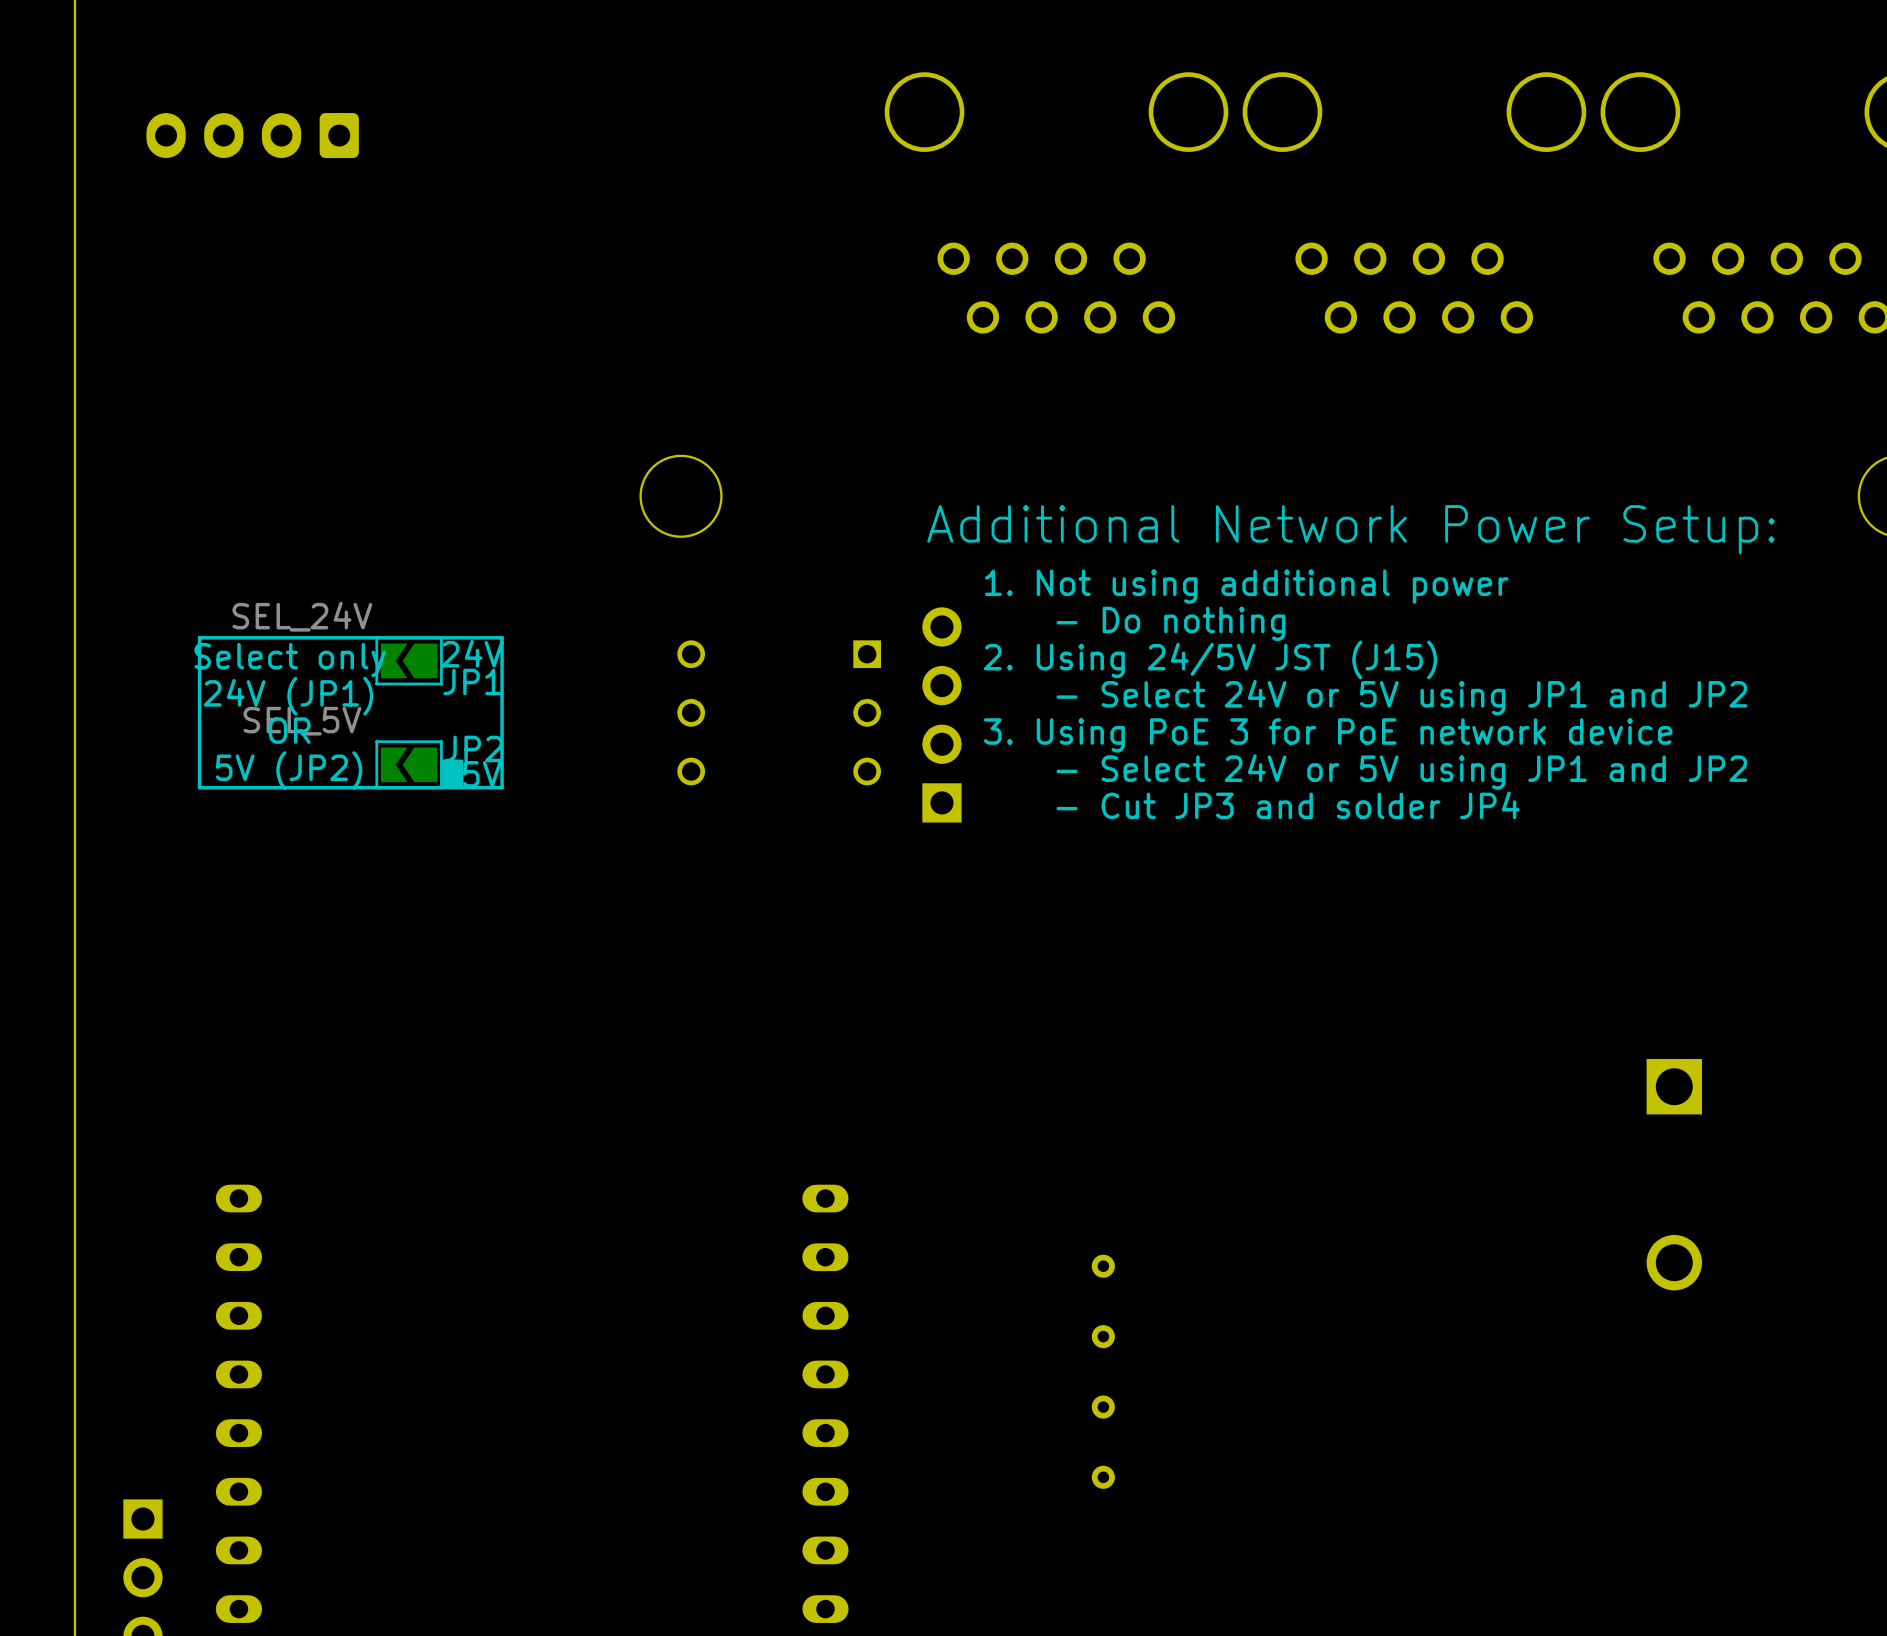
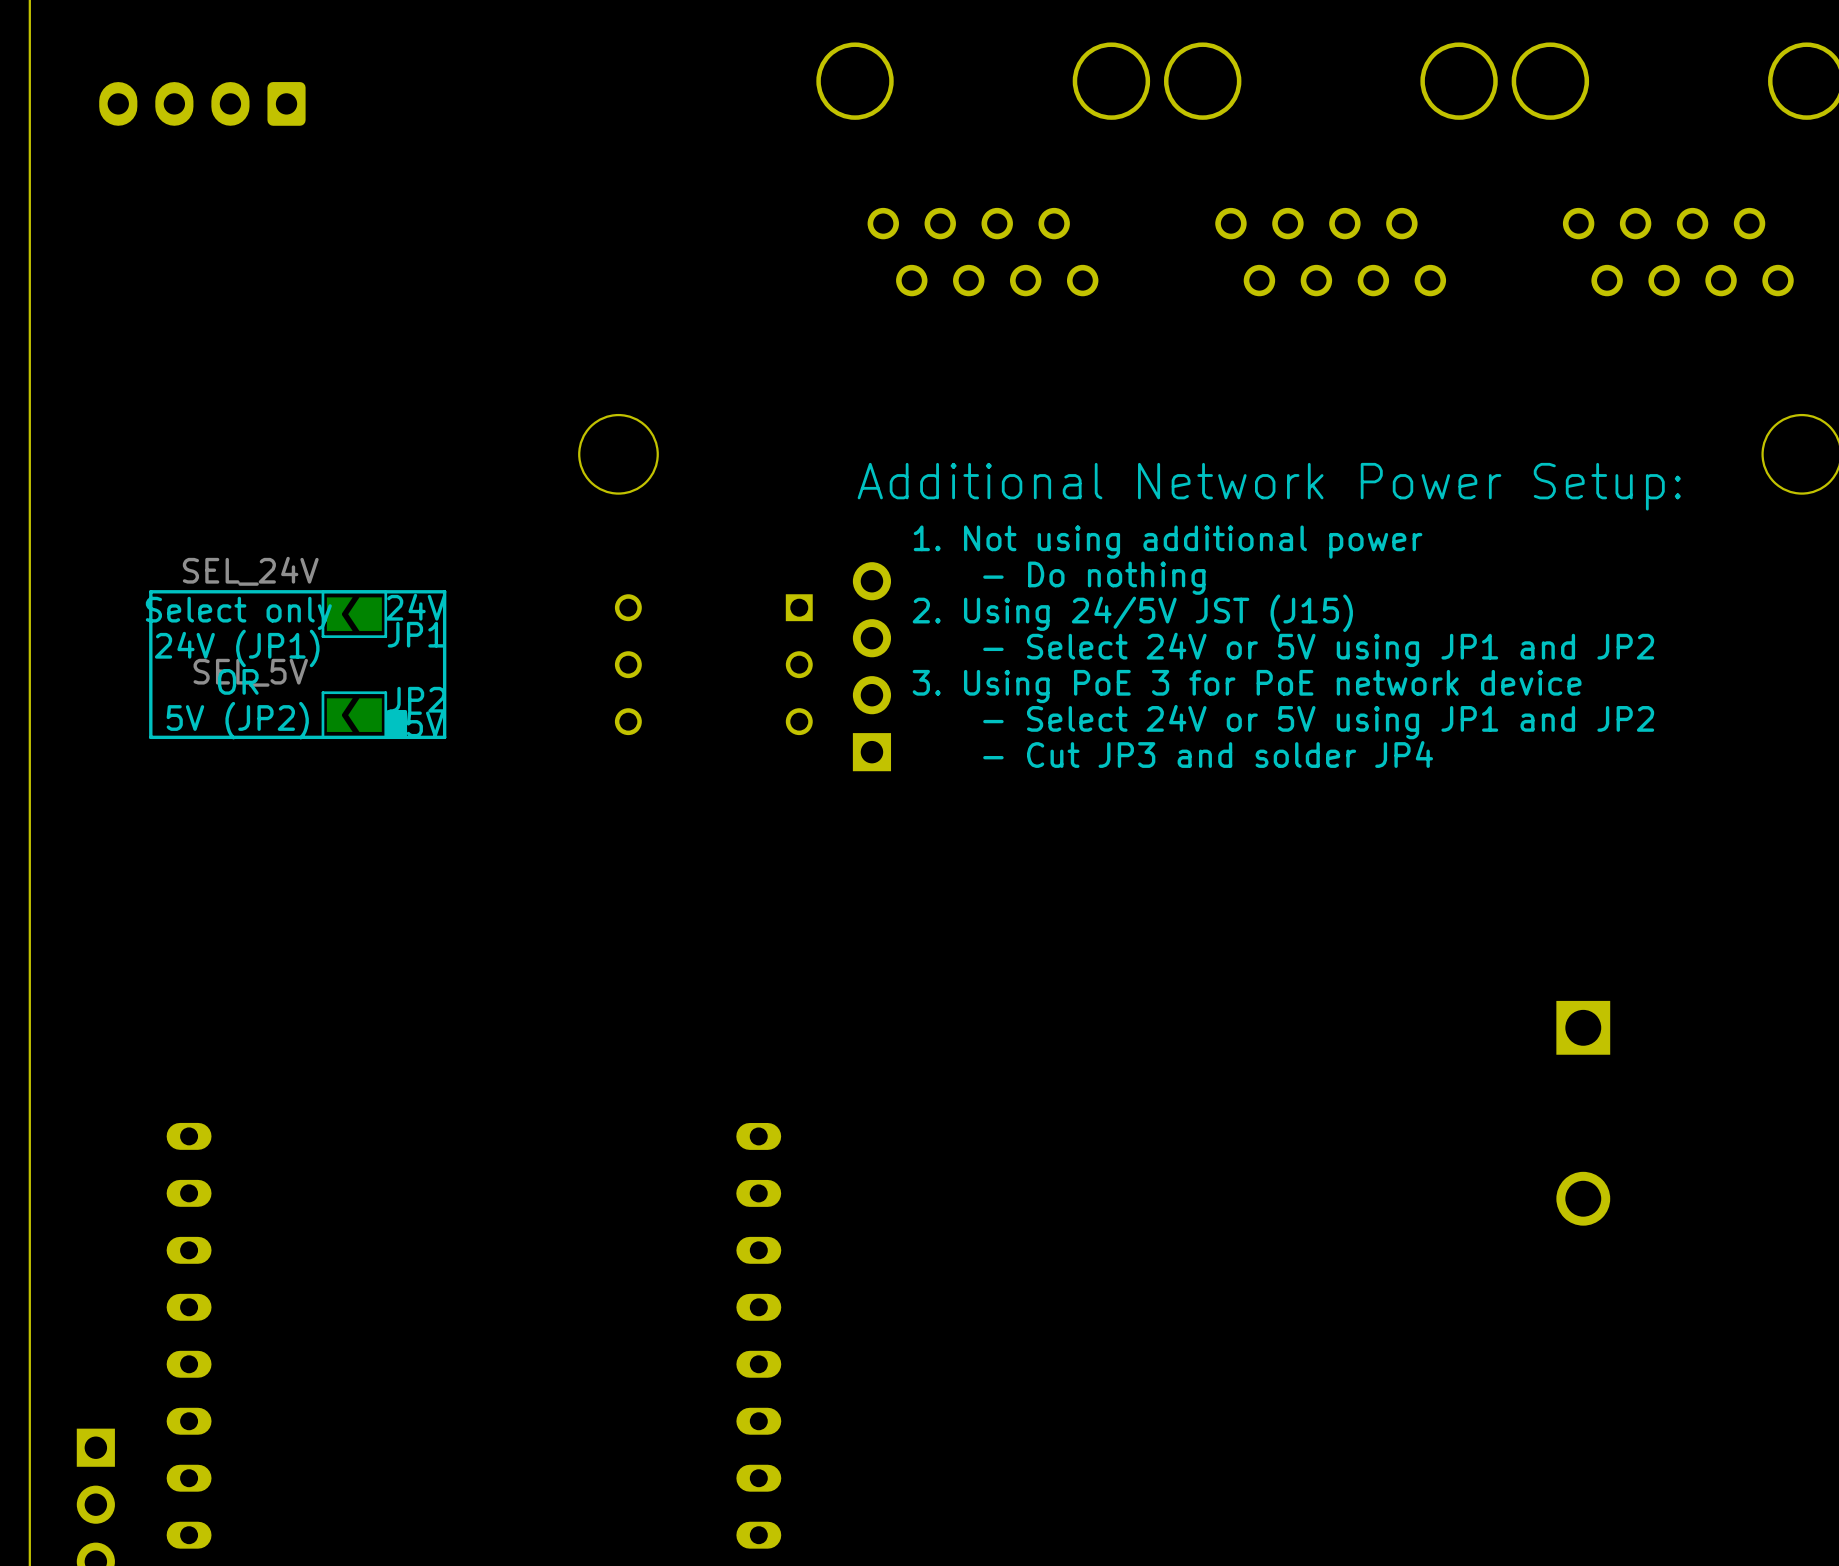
part: (1103, 1266) -> none
part: (1103, 1336) -> none
part: (1103, 1407) -> none
part: (1103, 1477) -> none

